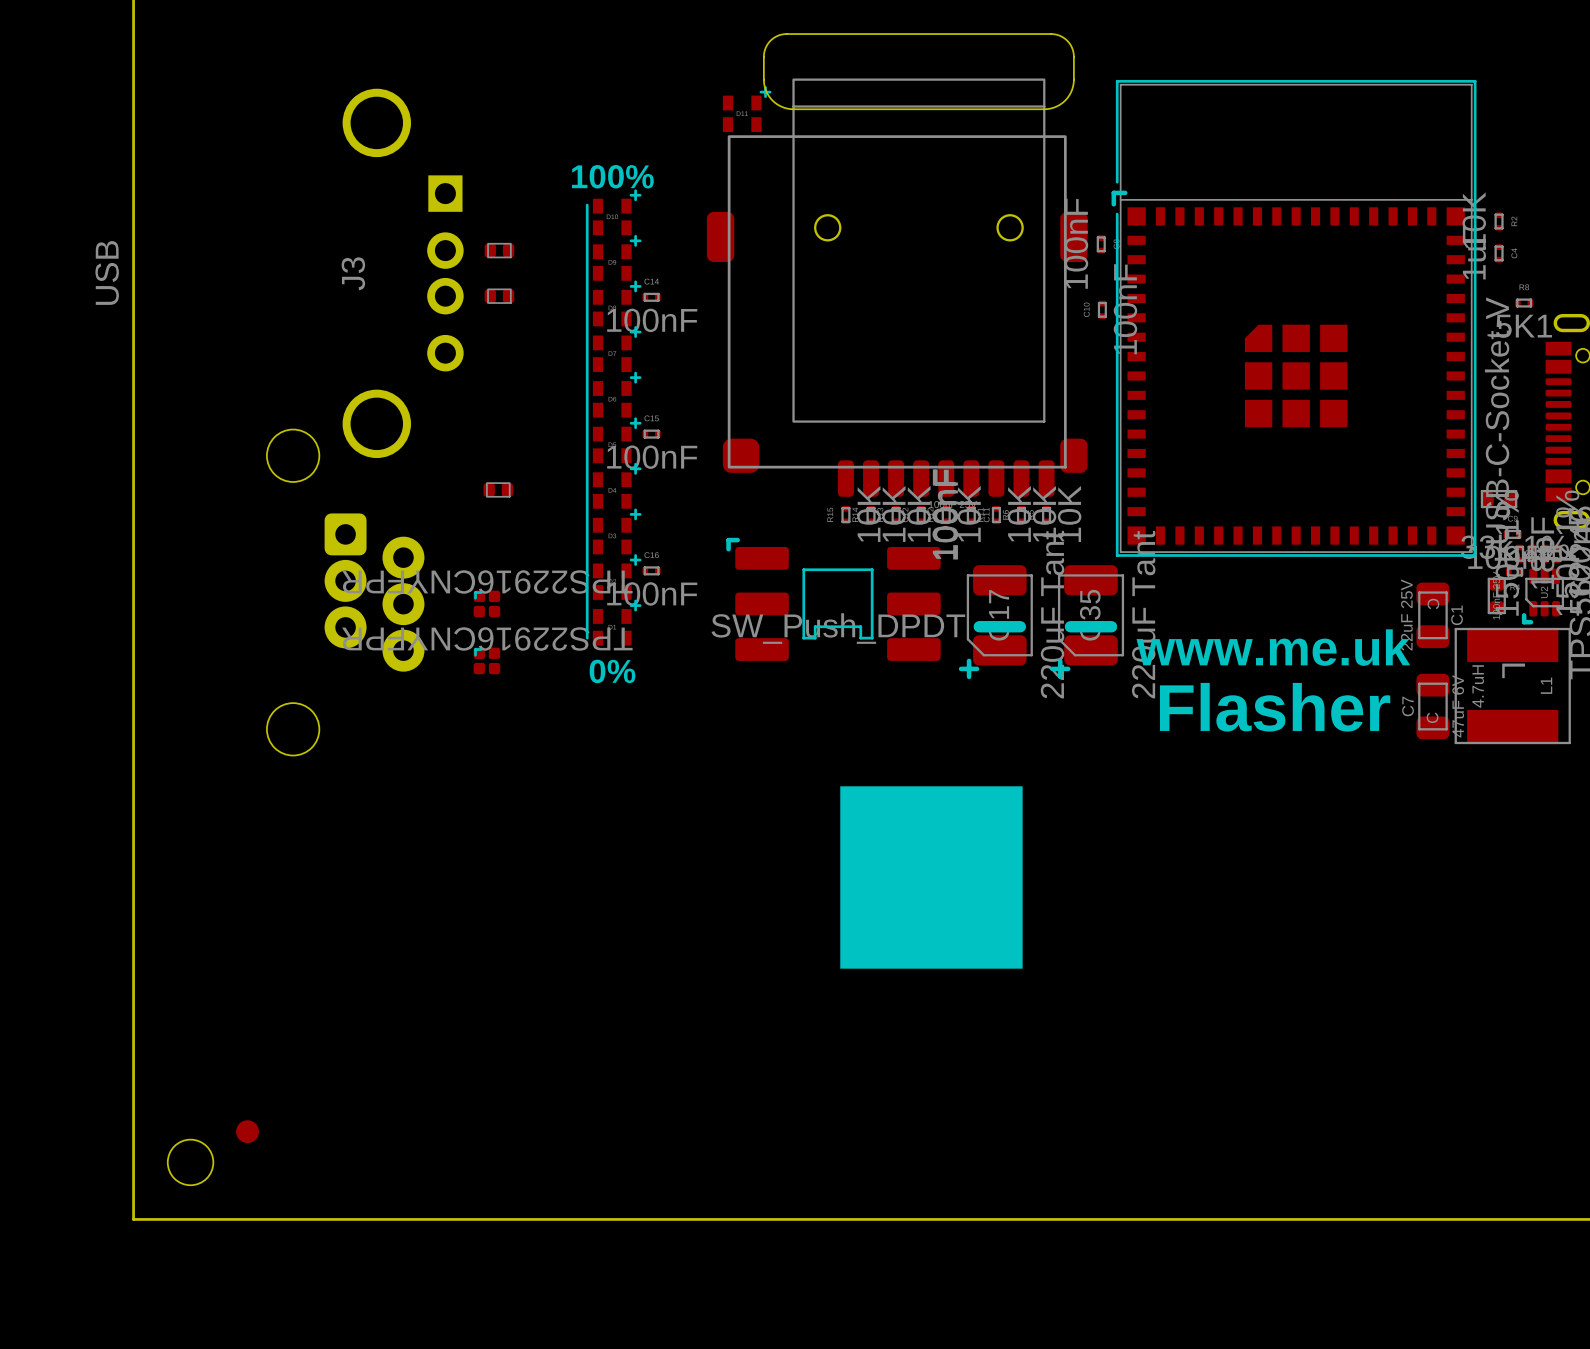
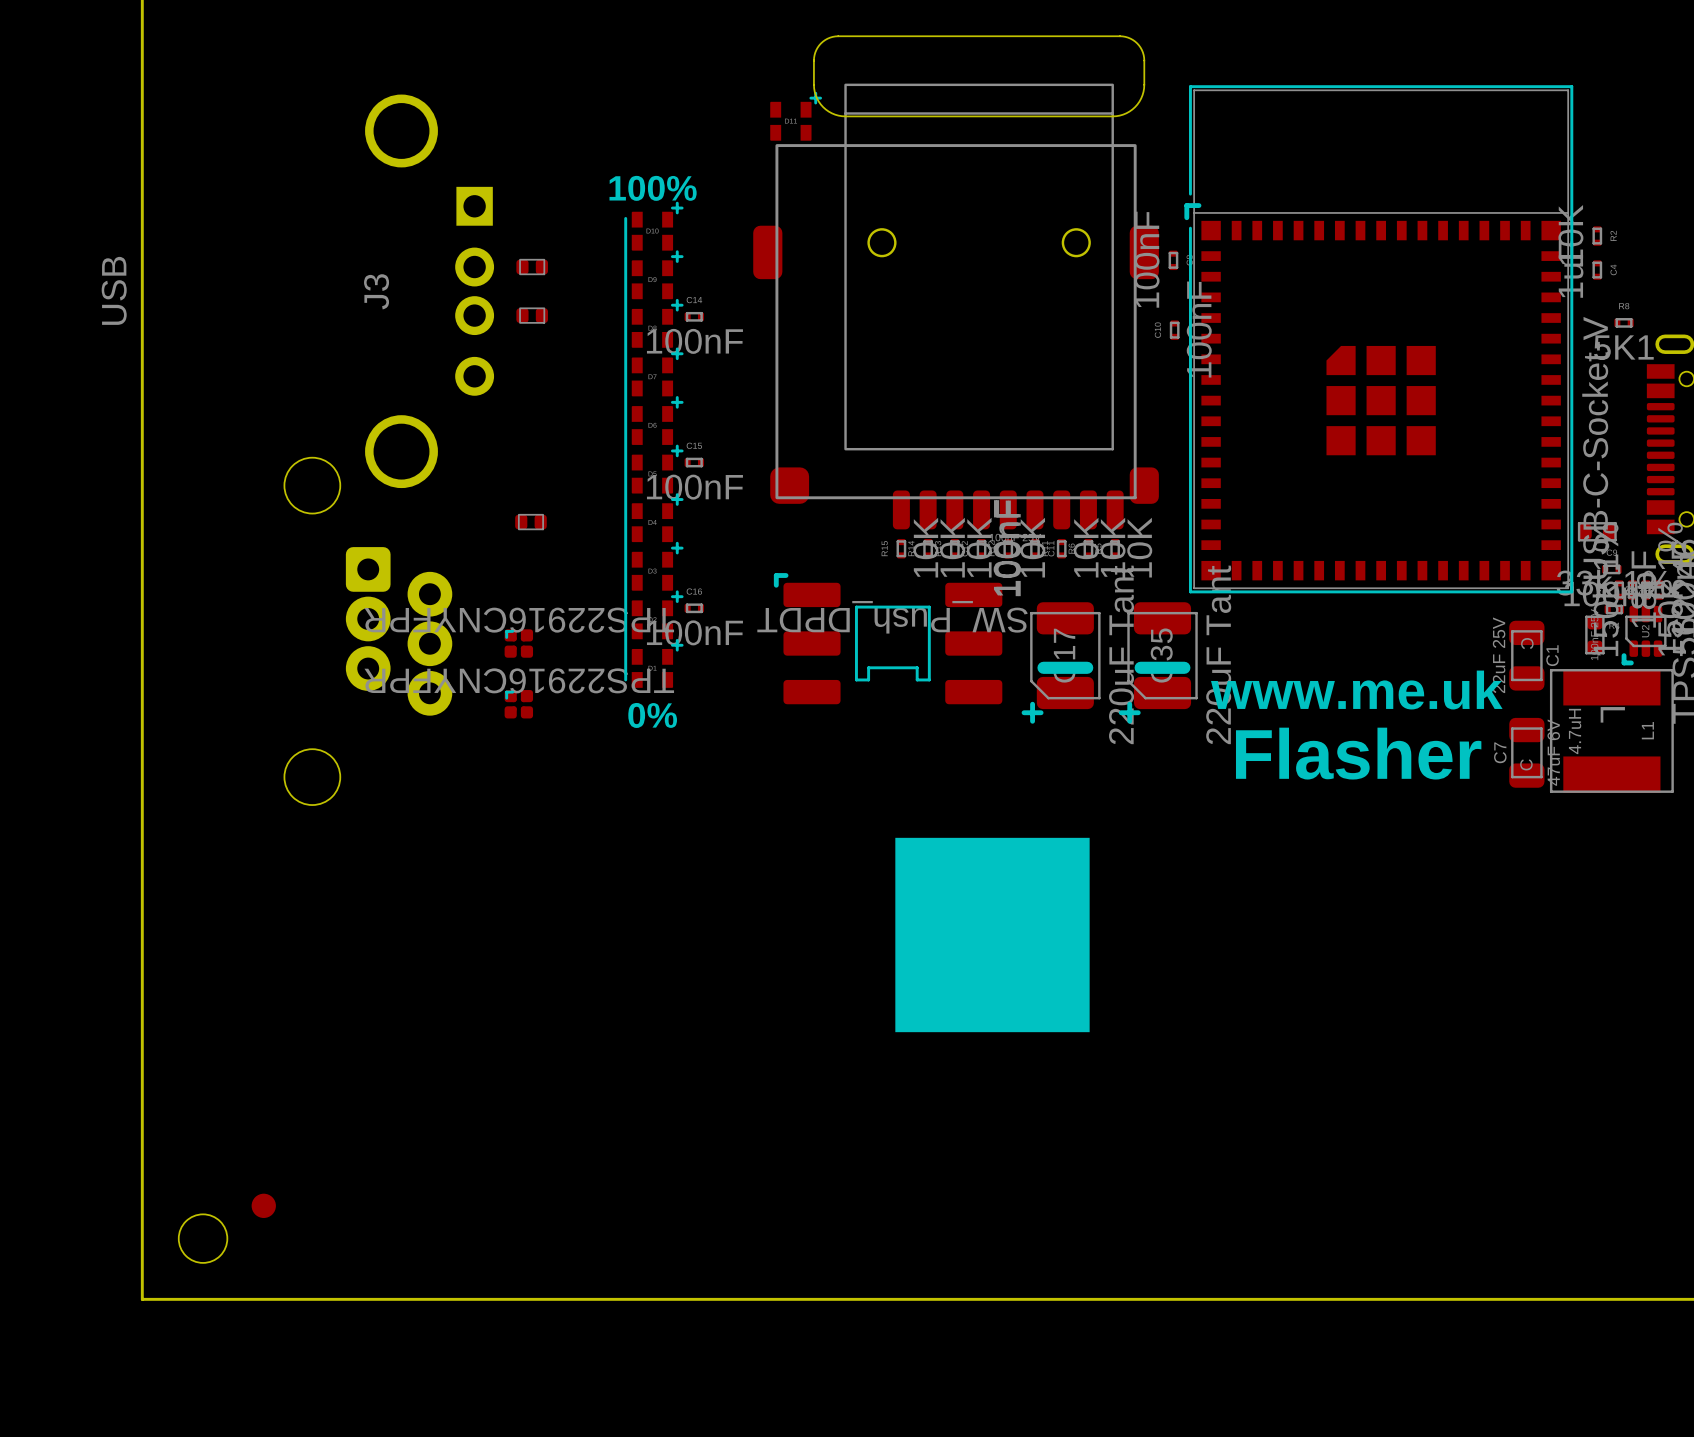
part value rotation: 0° (838, 628) -> 180° (892, 617)

